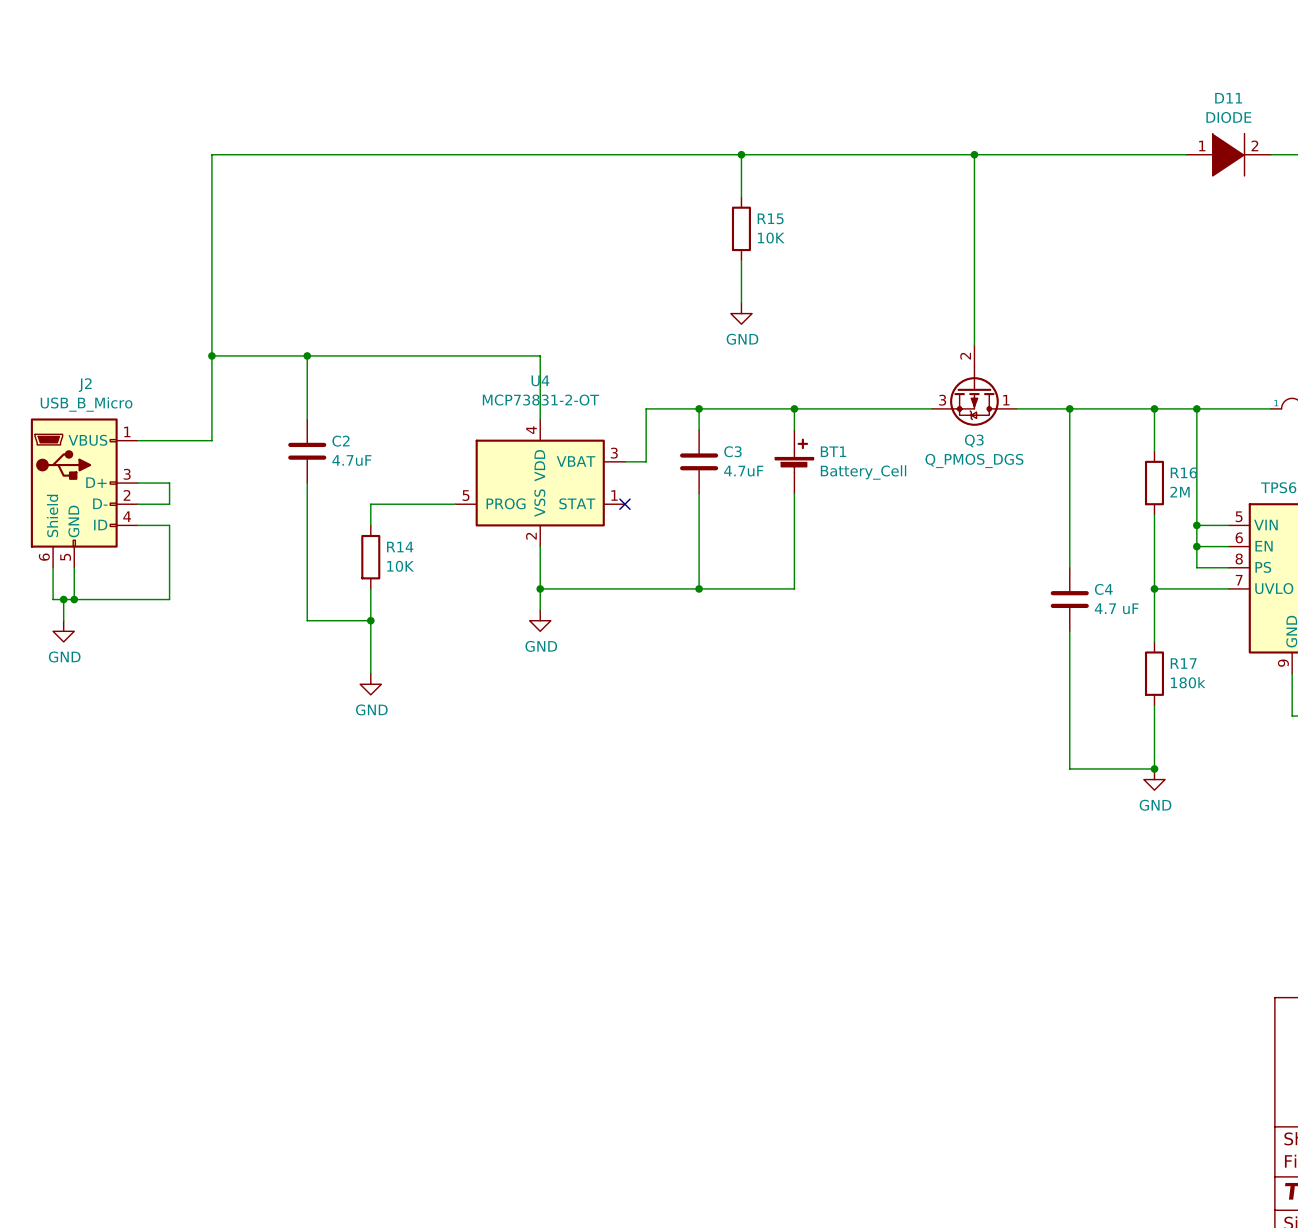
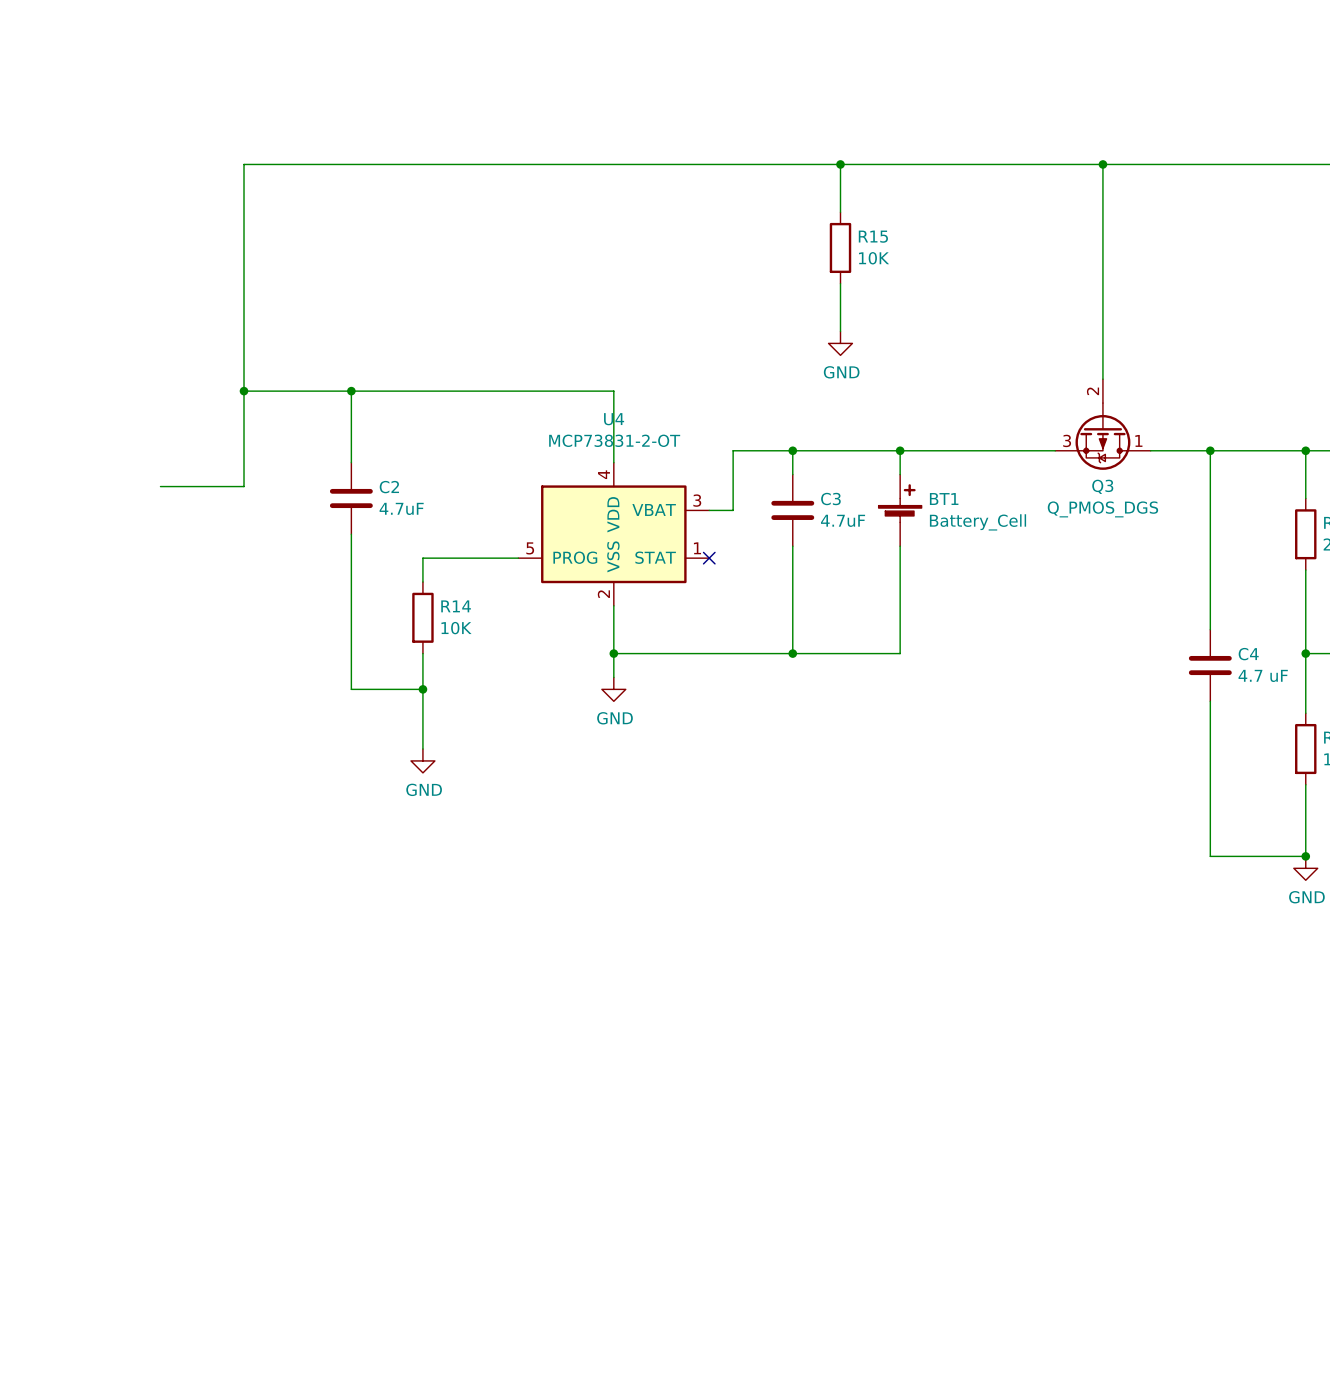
wire: (137, 483) (169, 483) (169, 504) (137, 504) -> none
J2: USB_B_Micro (84, 493) -> none
wire: (137, 525) (169, 525) (169, 599) (53, 599) (53, 567) -> none
wire: (74, 567) (74, 599) -> none
wire: (63, 599) (63, 620) -> none
junction: (63, 599) -> none
junction: (74, 599) -> none
power symbol: GND (63, 631) -> none

